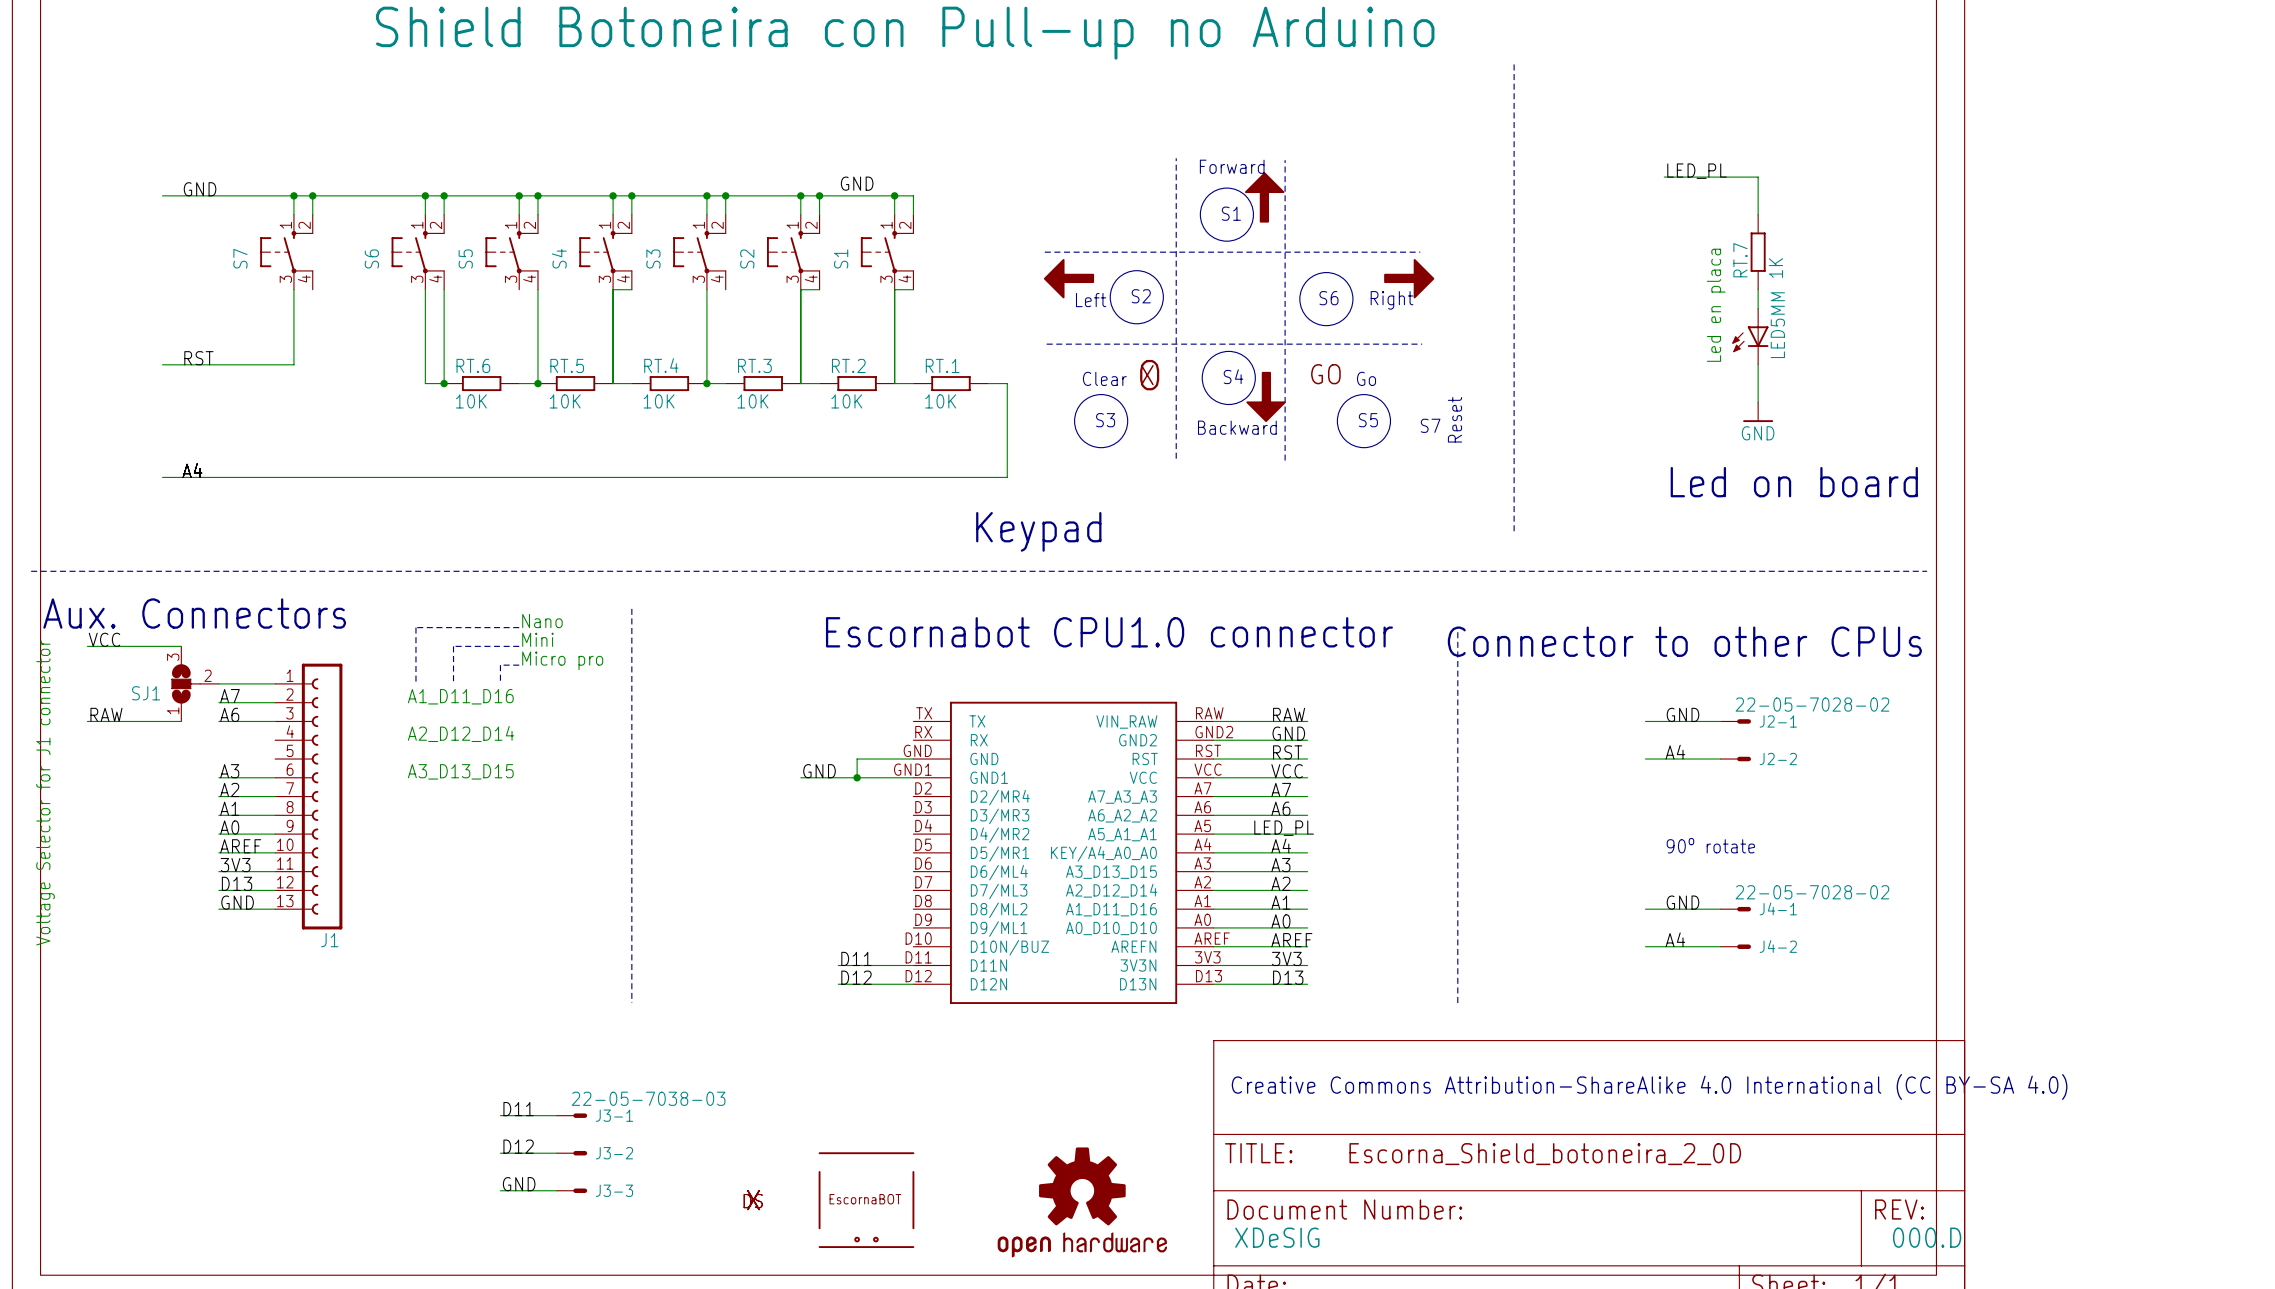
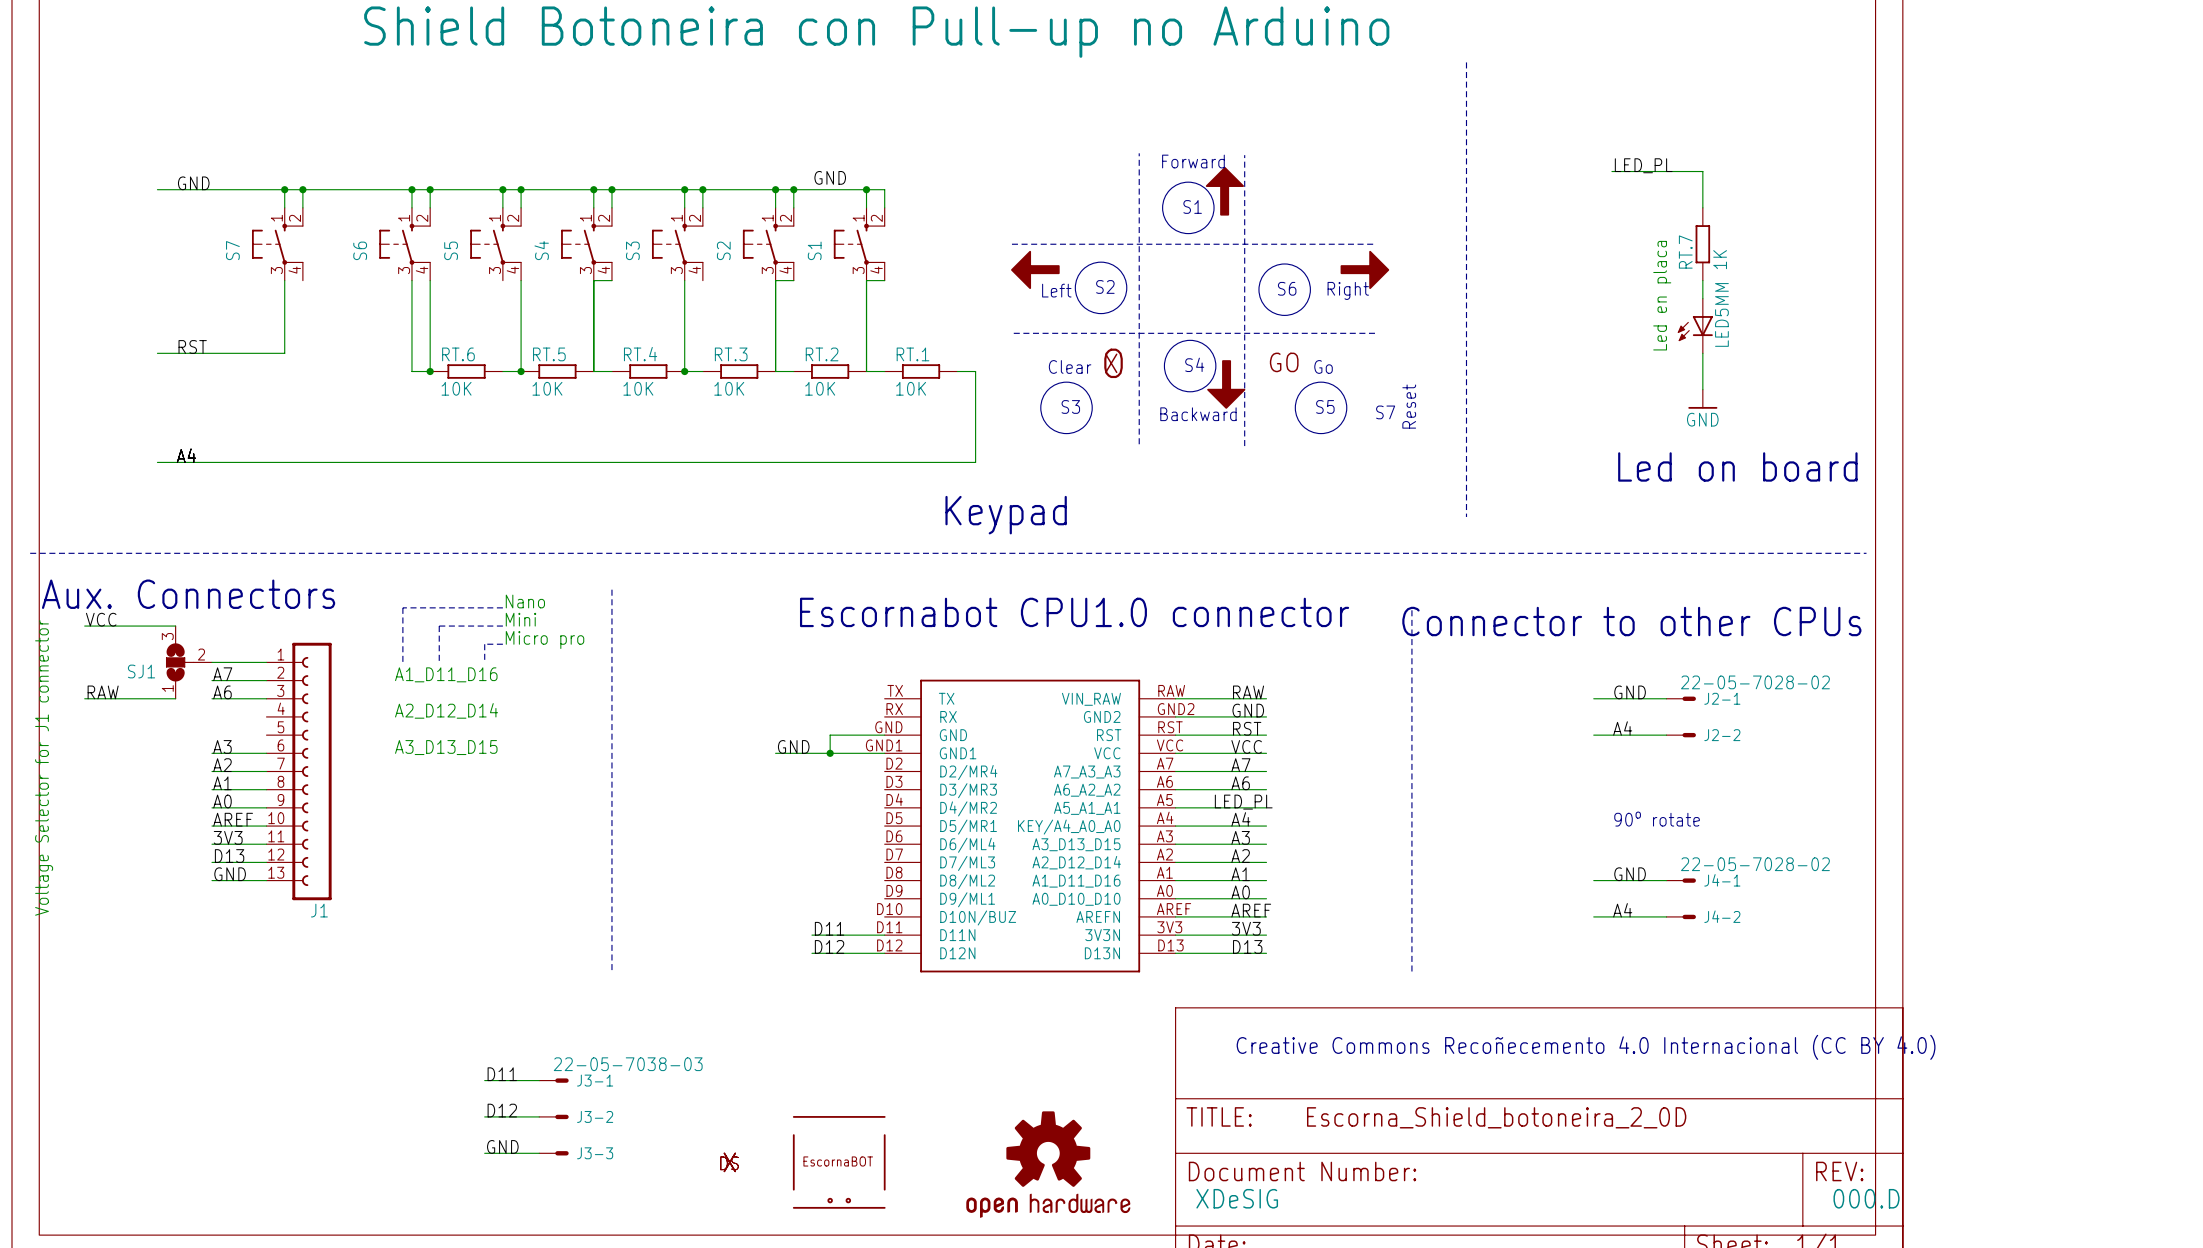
text: Creative Commons Attribution-ShareAlike 4.0 International (CC BY-SA 4.0) (1649, 1086) -> Creative Commons Recoñecemento 4.0 Internacional (CC BY 4.0) (1586, 1047)

